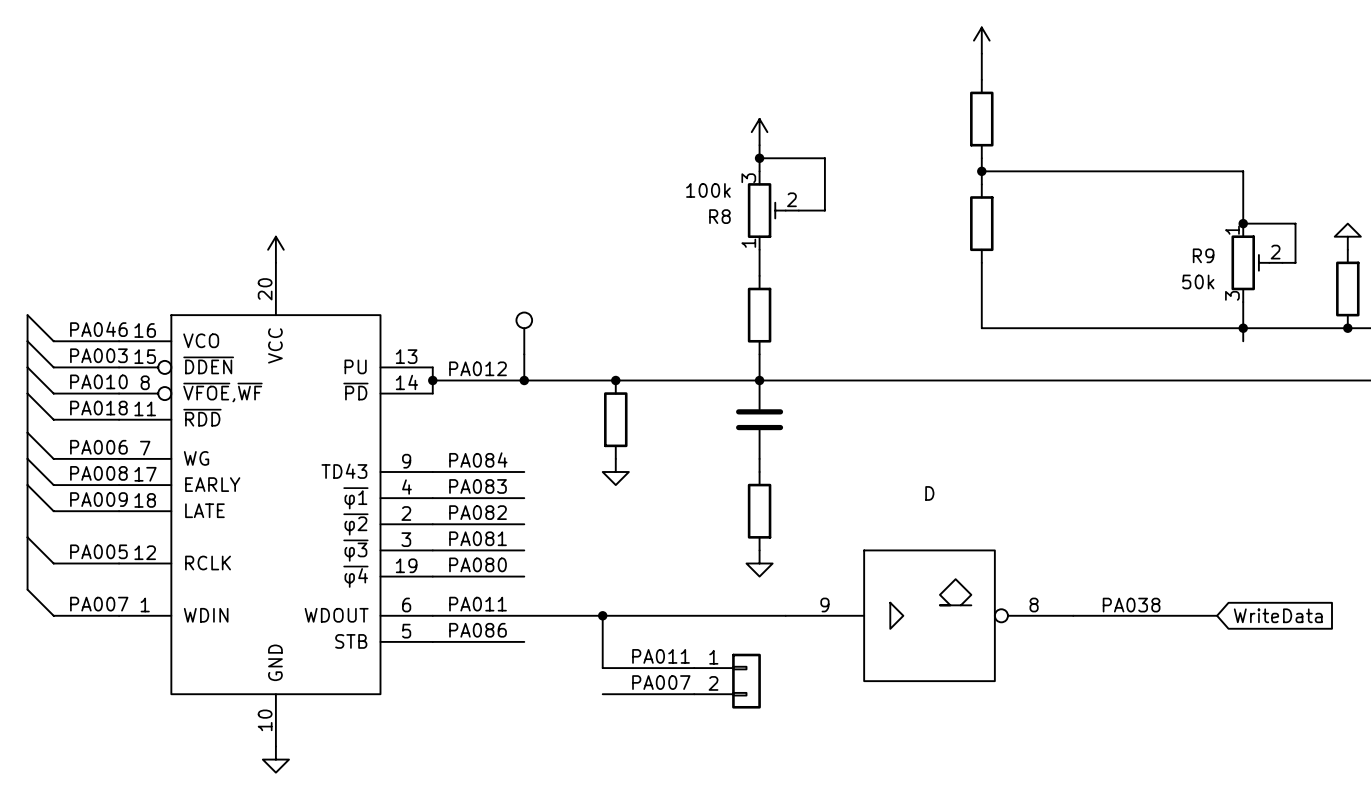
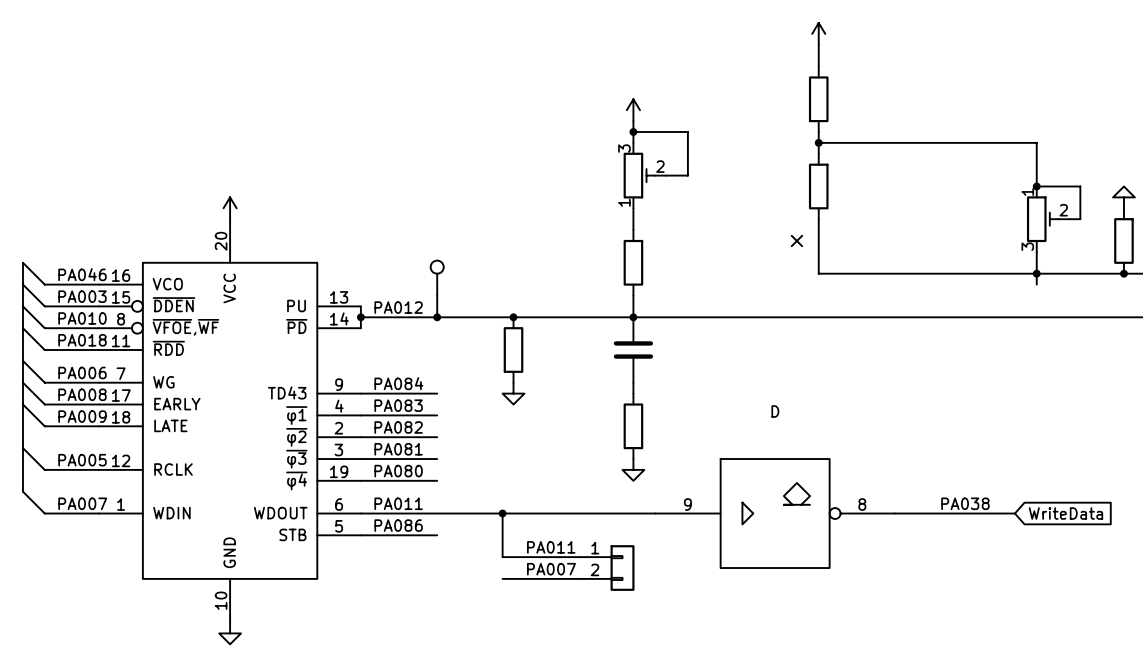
R8 value: 100k (708, 190) -> none
R8 name: R8 (719, 216) -> none
R9 name: R9 (1203, 255) -> none
R9 value: 50k (1198, 281) -> none
no-connect mark: none -> (796, 240)
label: none -> PA038 (965, 503)
text: PA038 (1131, 605) -> none

